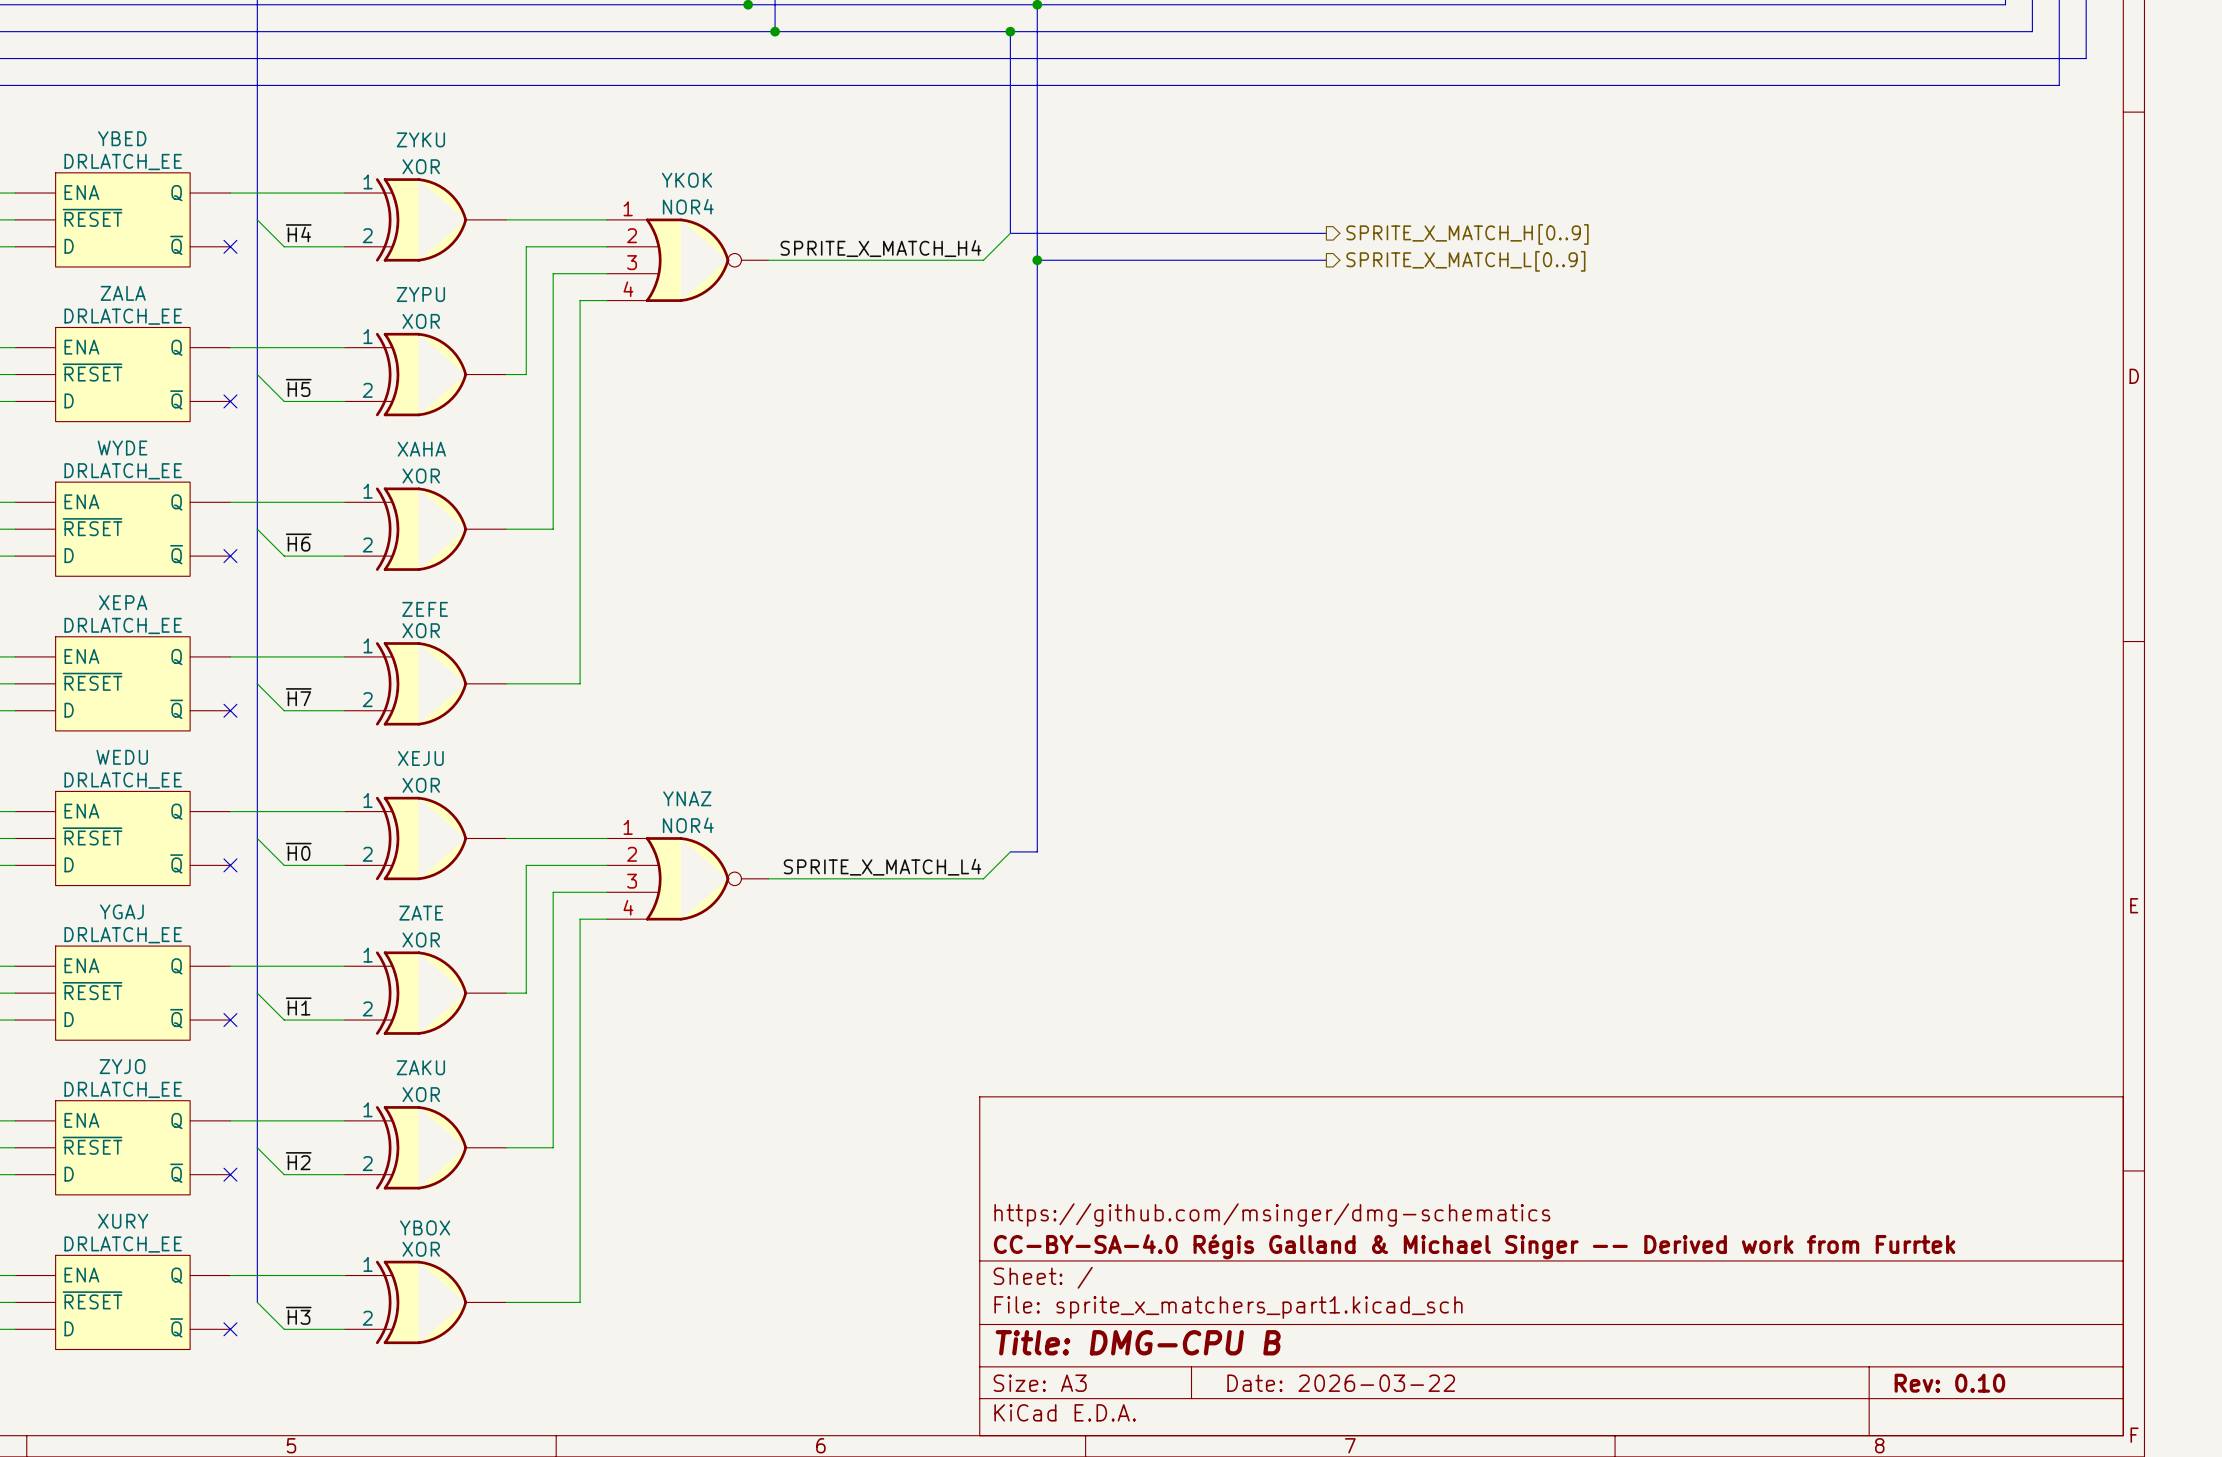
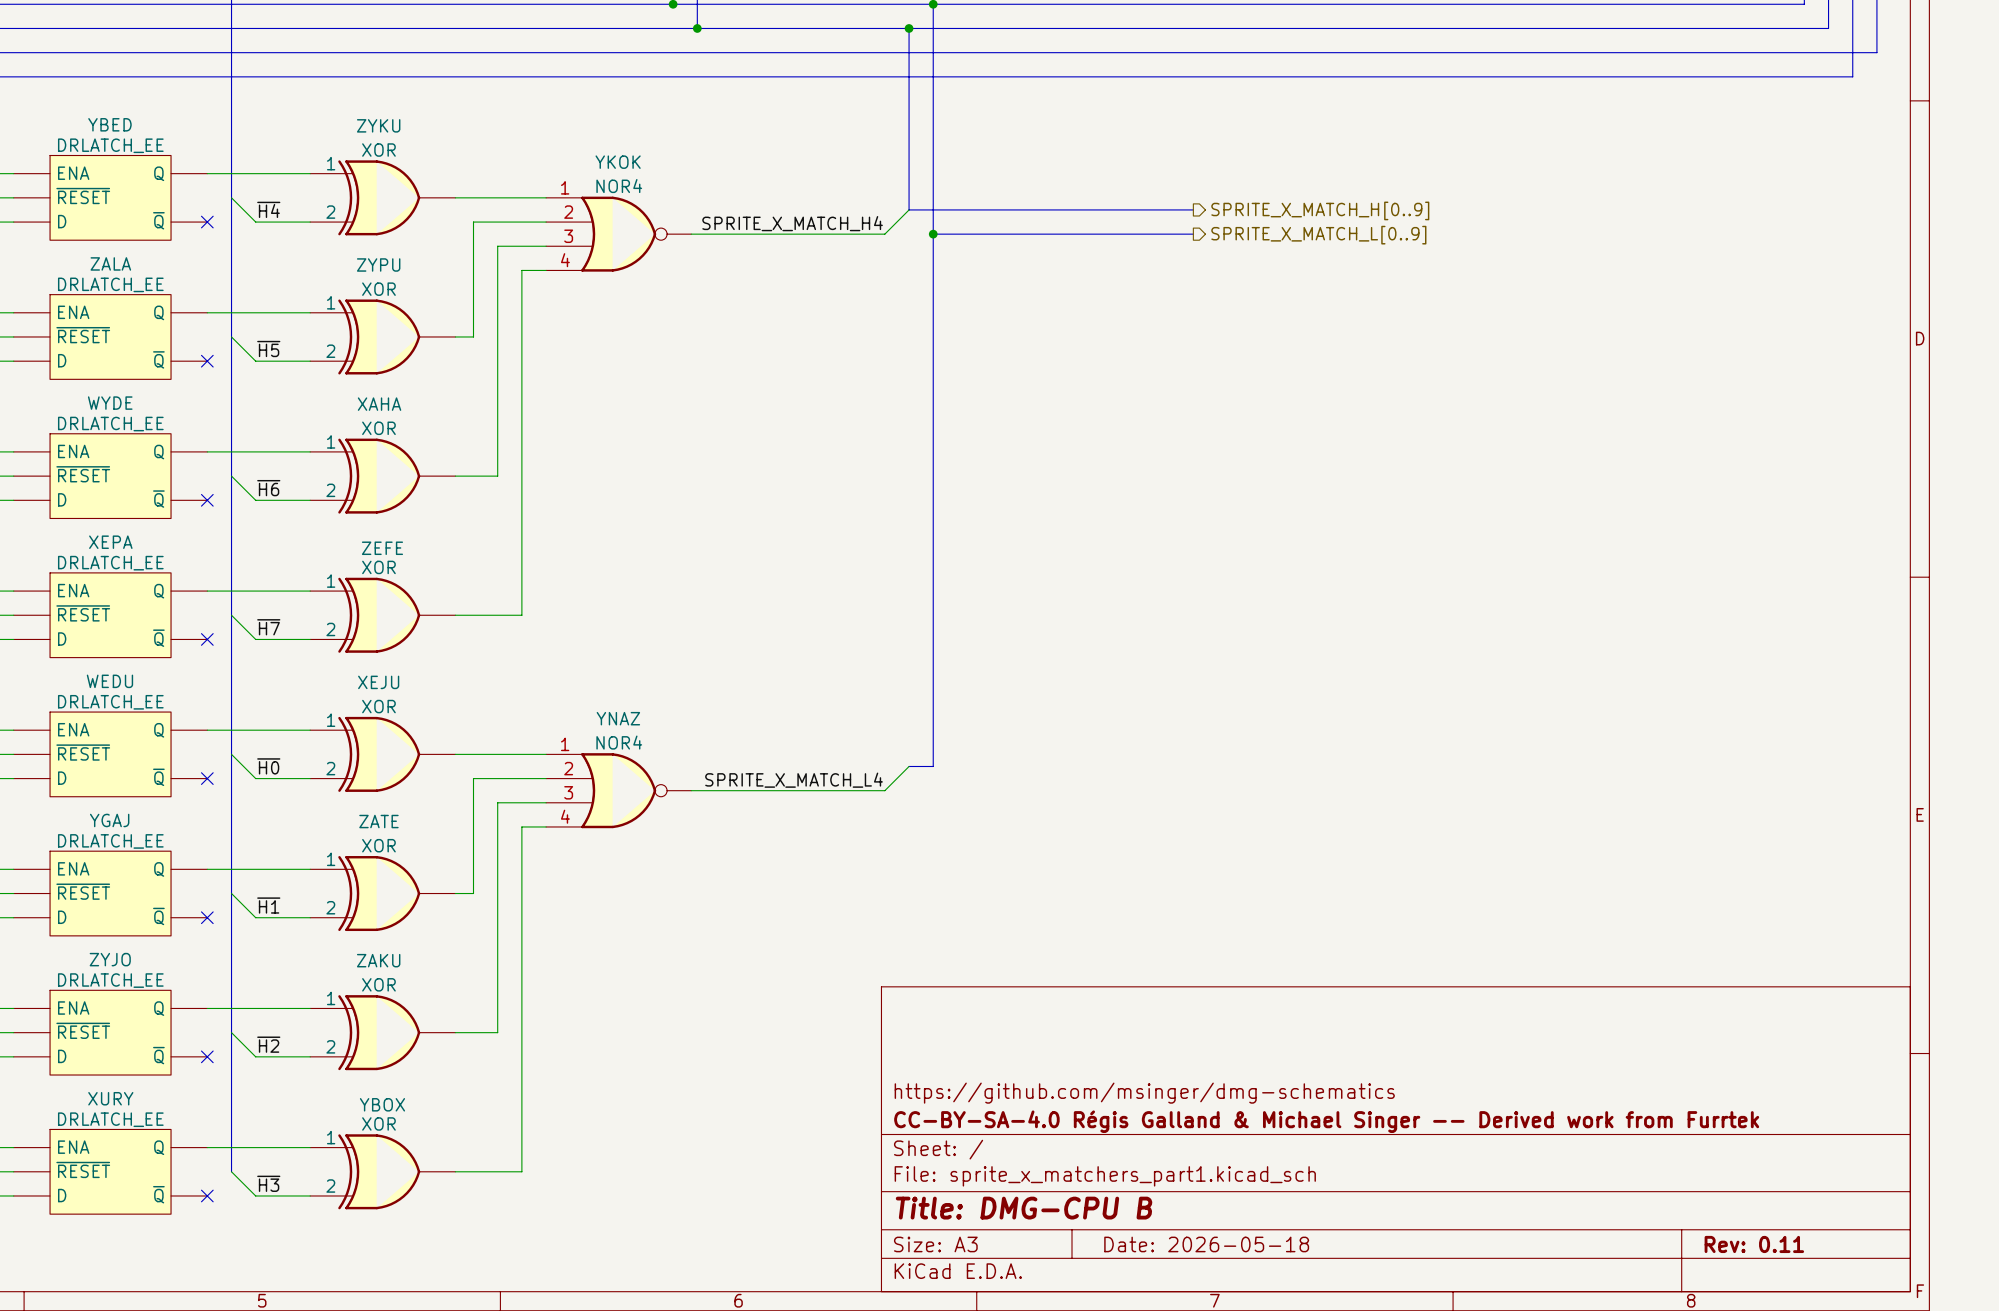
title block: Date: 2026-03-22 (1341, 1383) -> Date: 2026-05-18 (1206, 1244)
title block: Rev: 0.10 (1949, 1383) -> Rev: 0.11 (1754, 1244)

